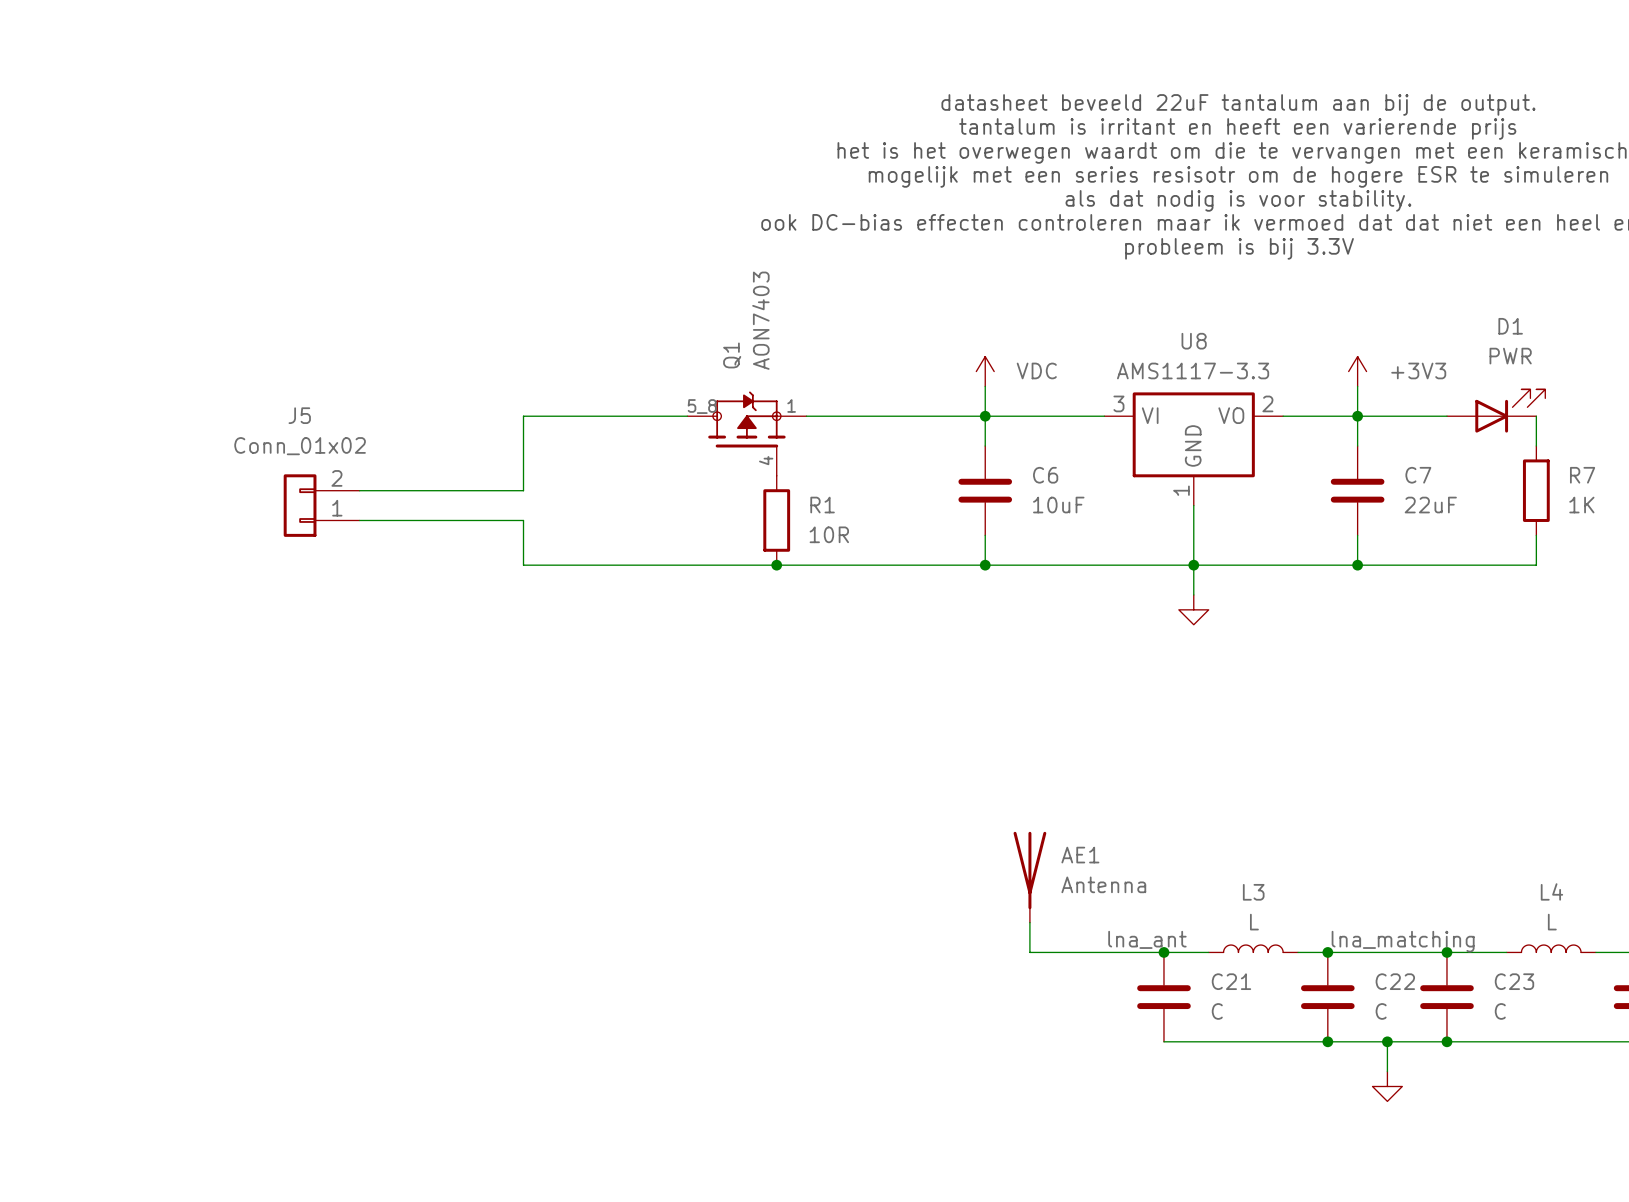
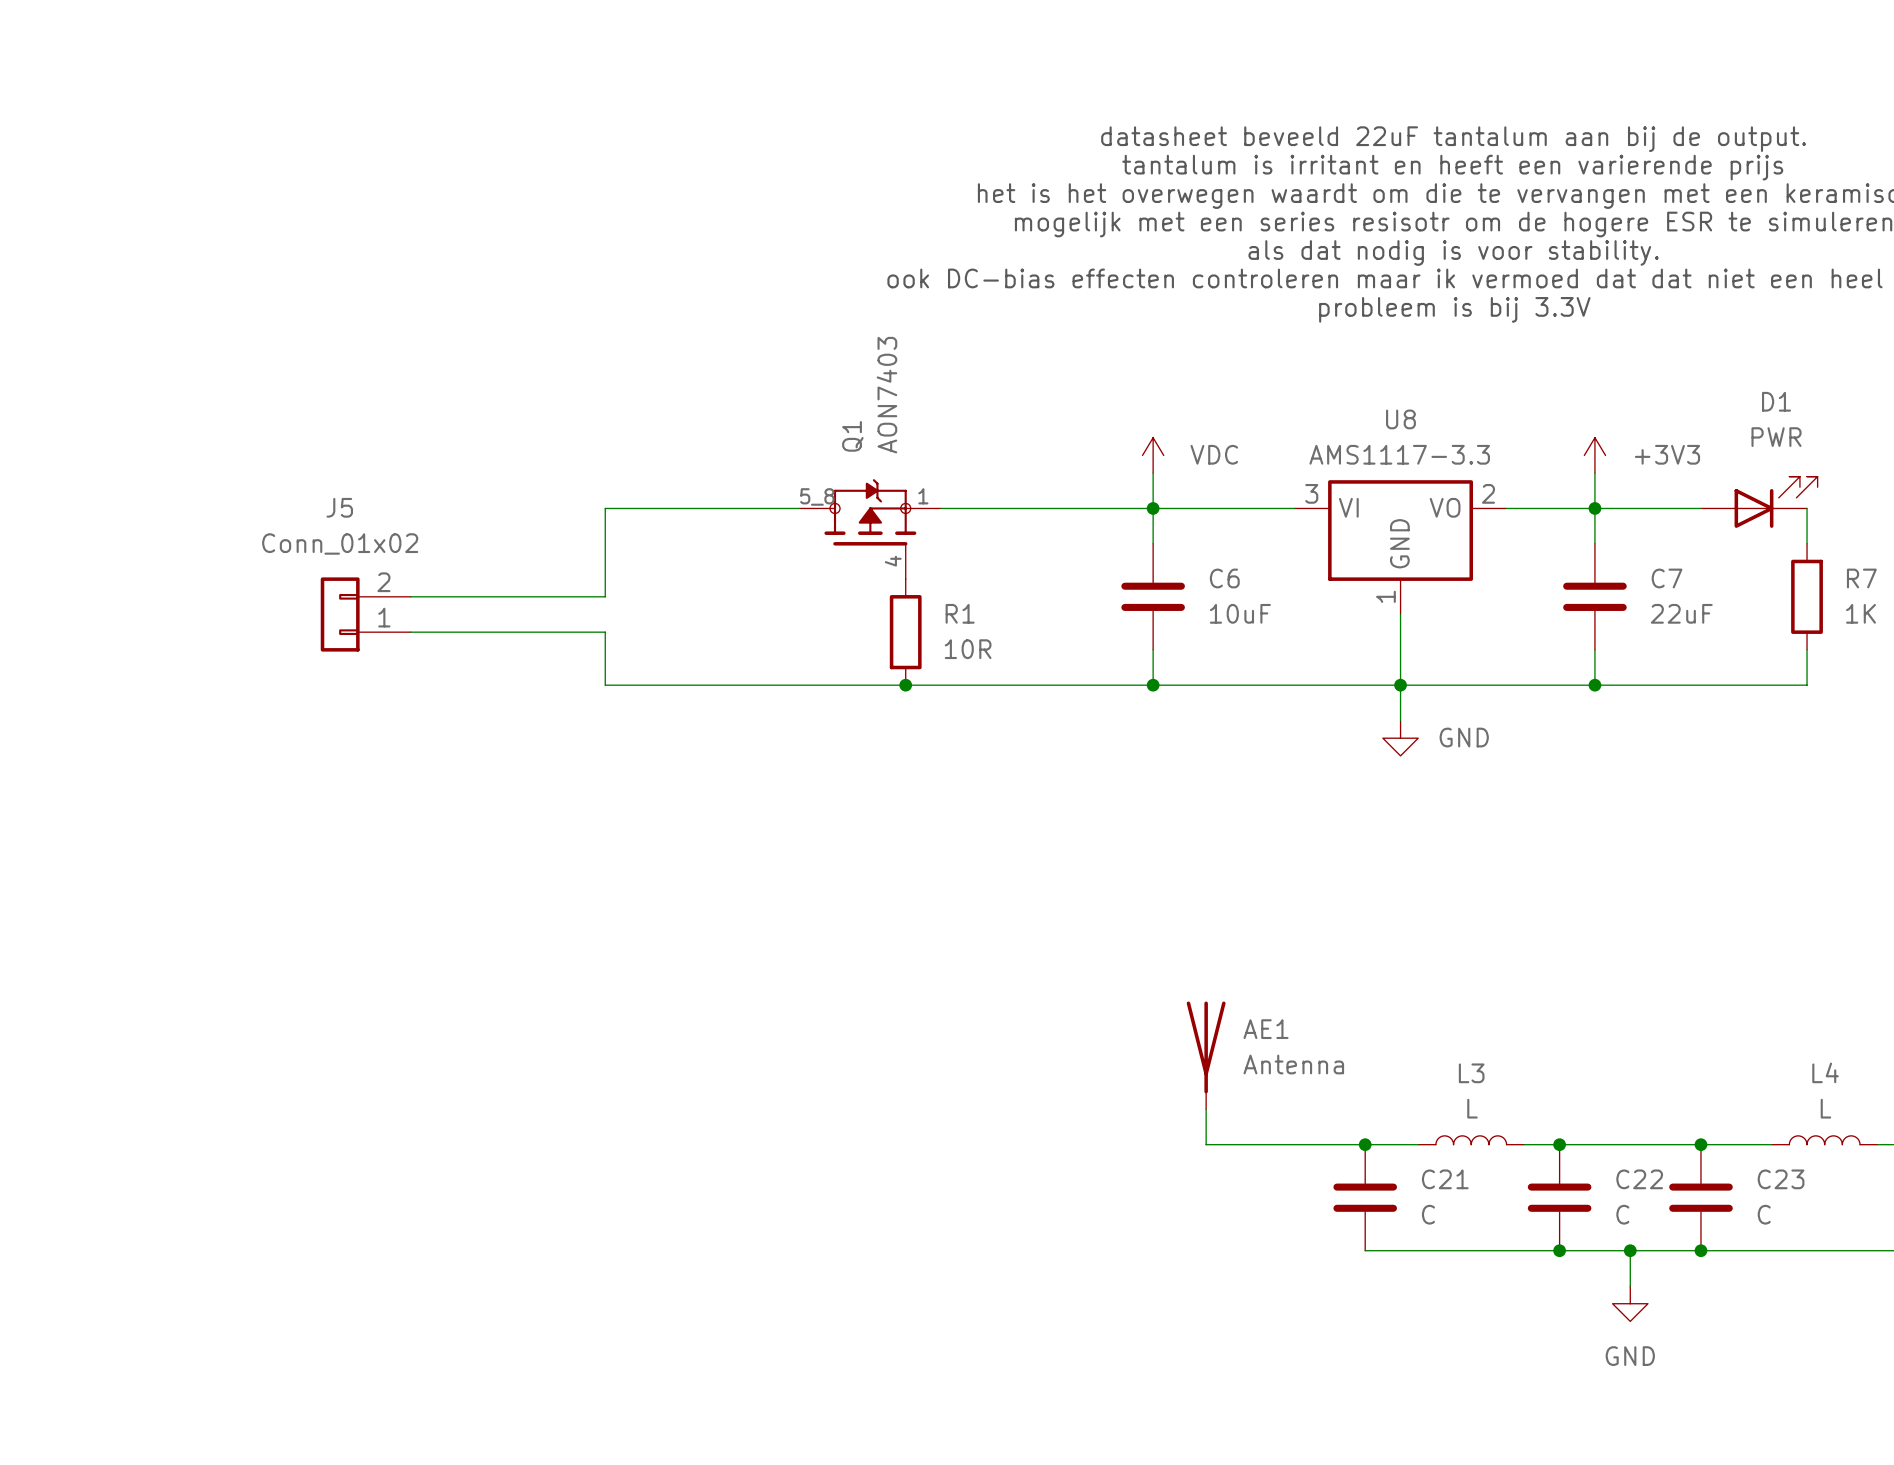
power symbol text: none -> GND (1464, 737)
label: lna_ant (1147, 939) -> none
label: lna_matching (1403, 941) -> none
power symbol text: none -> GND (1630, 1356)

